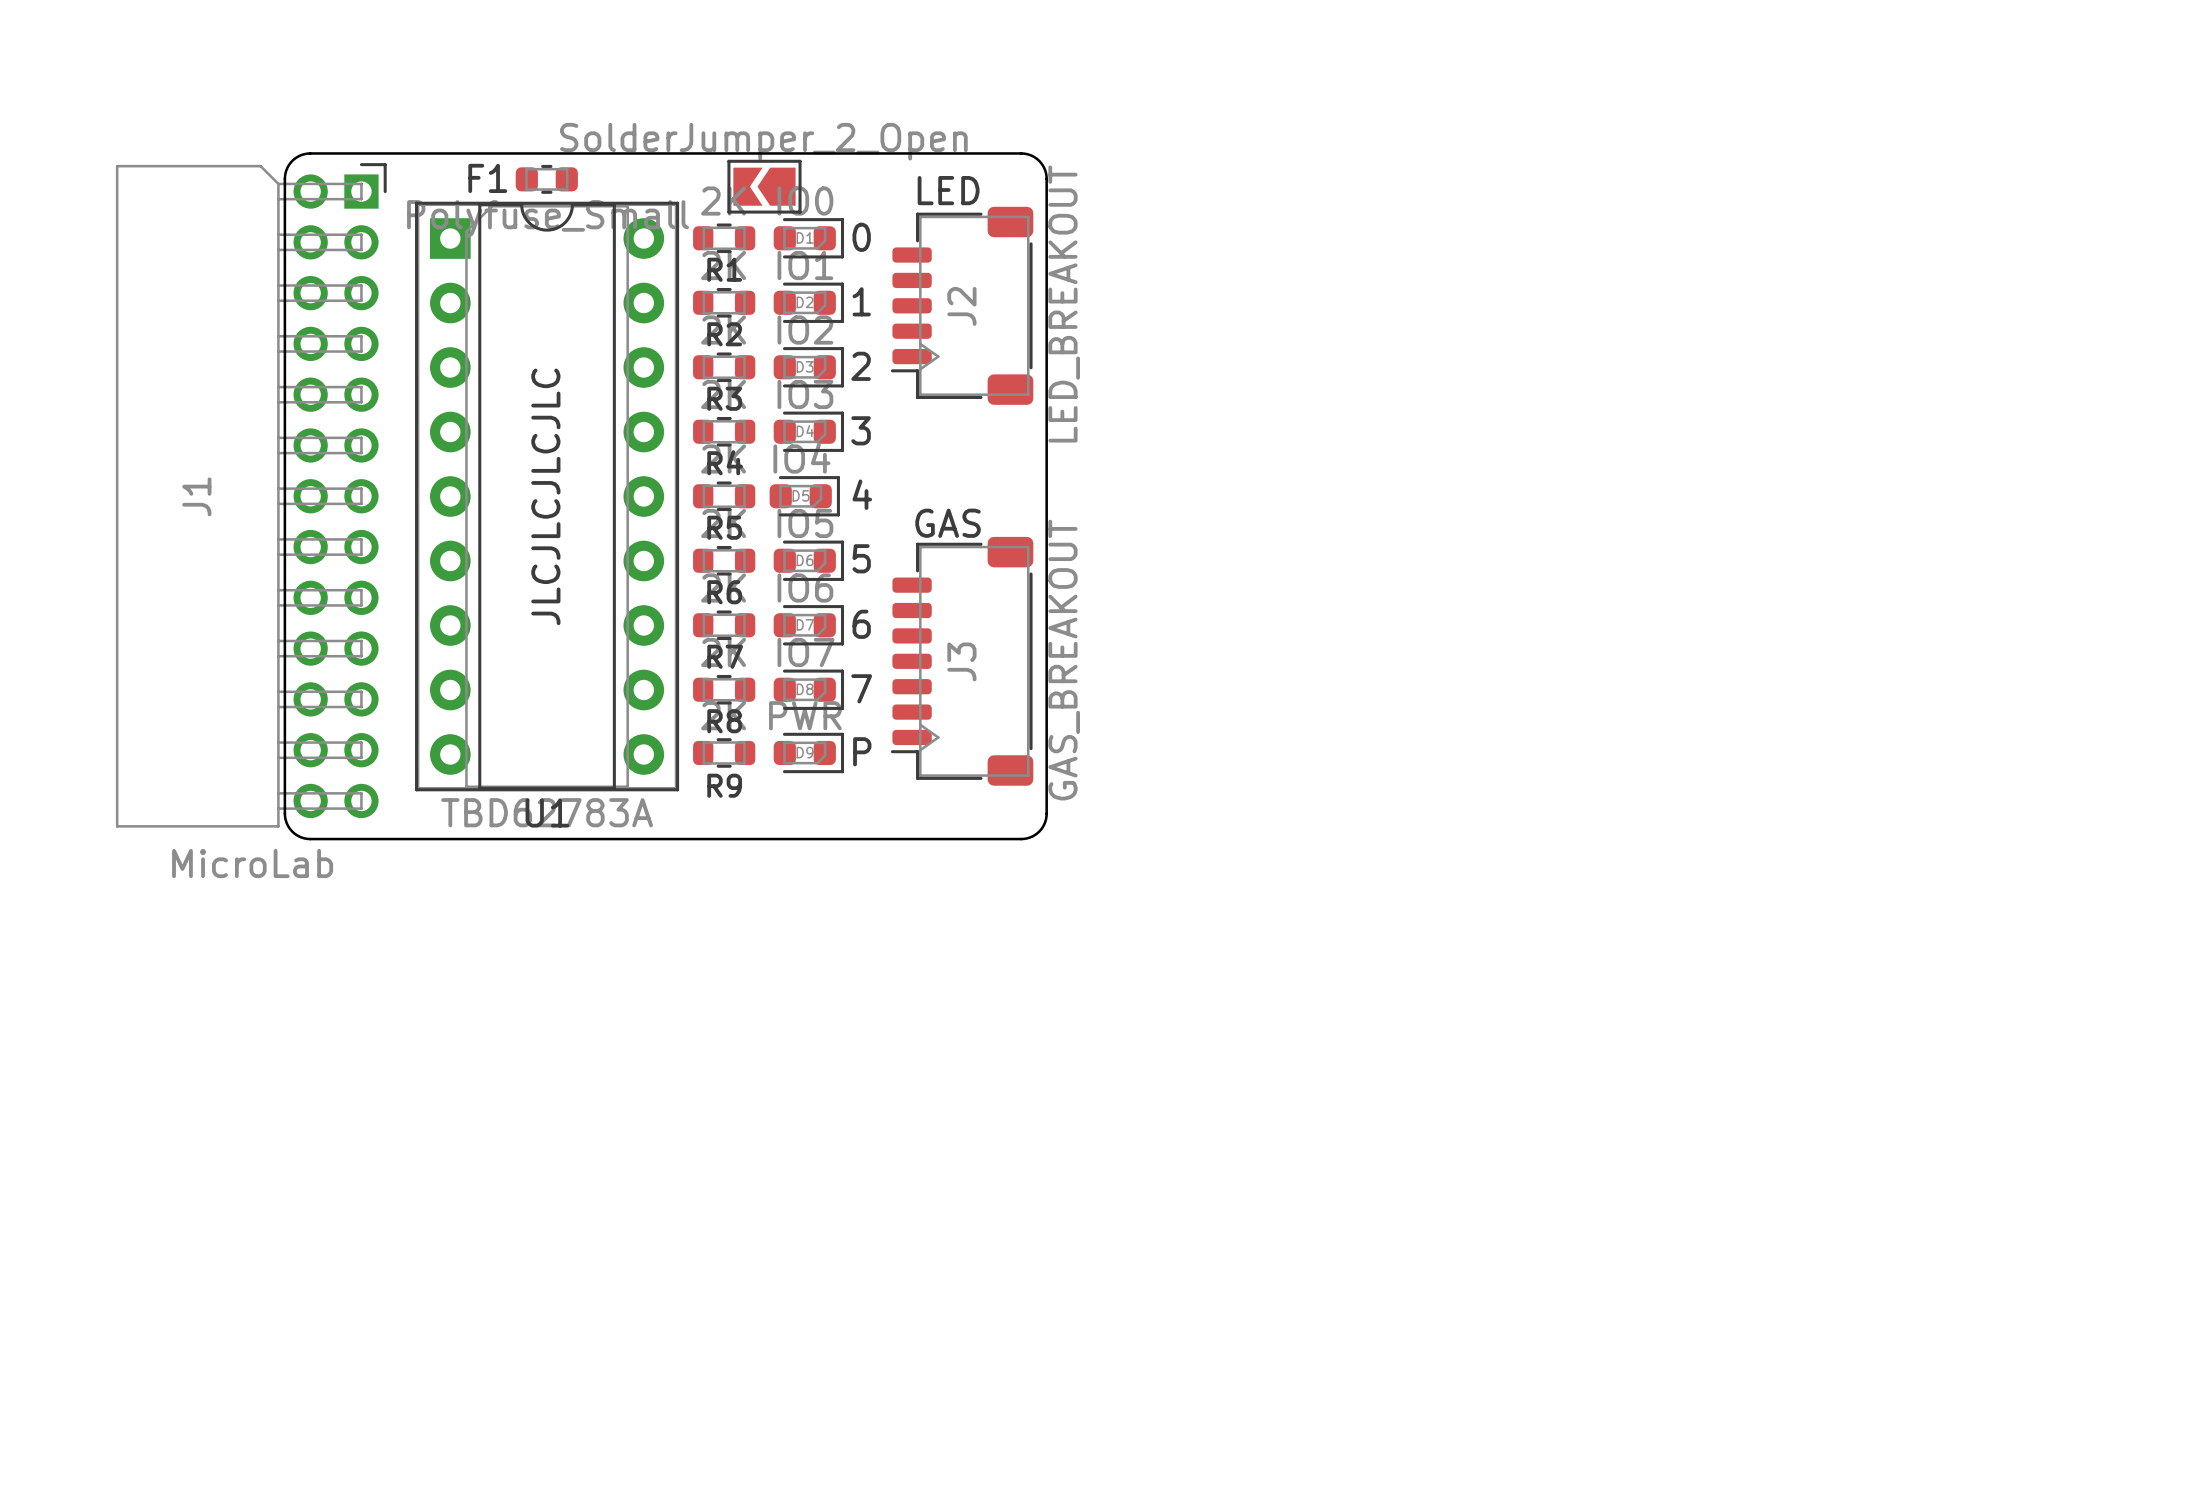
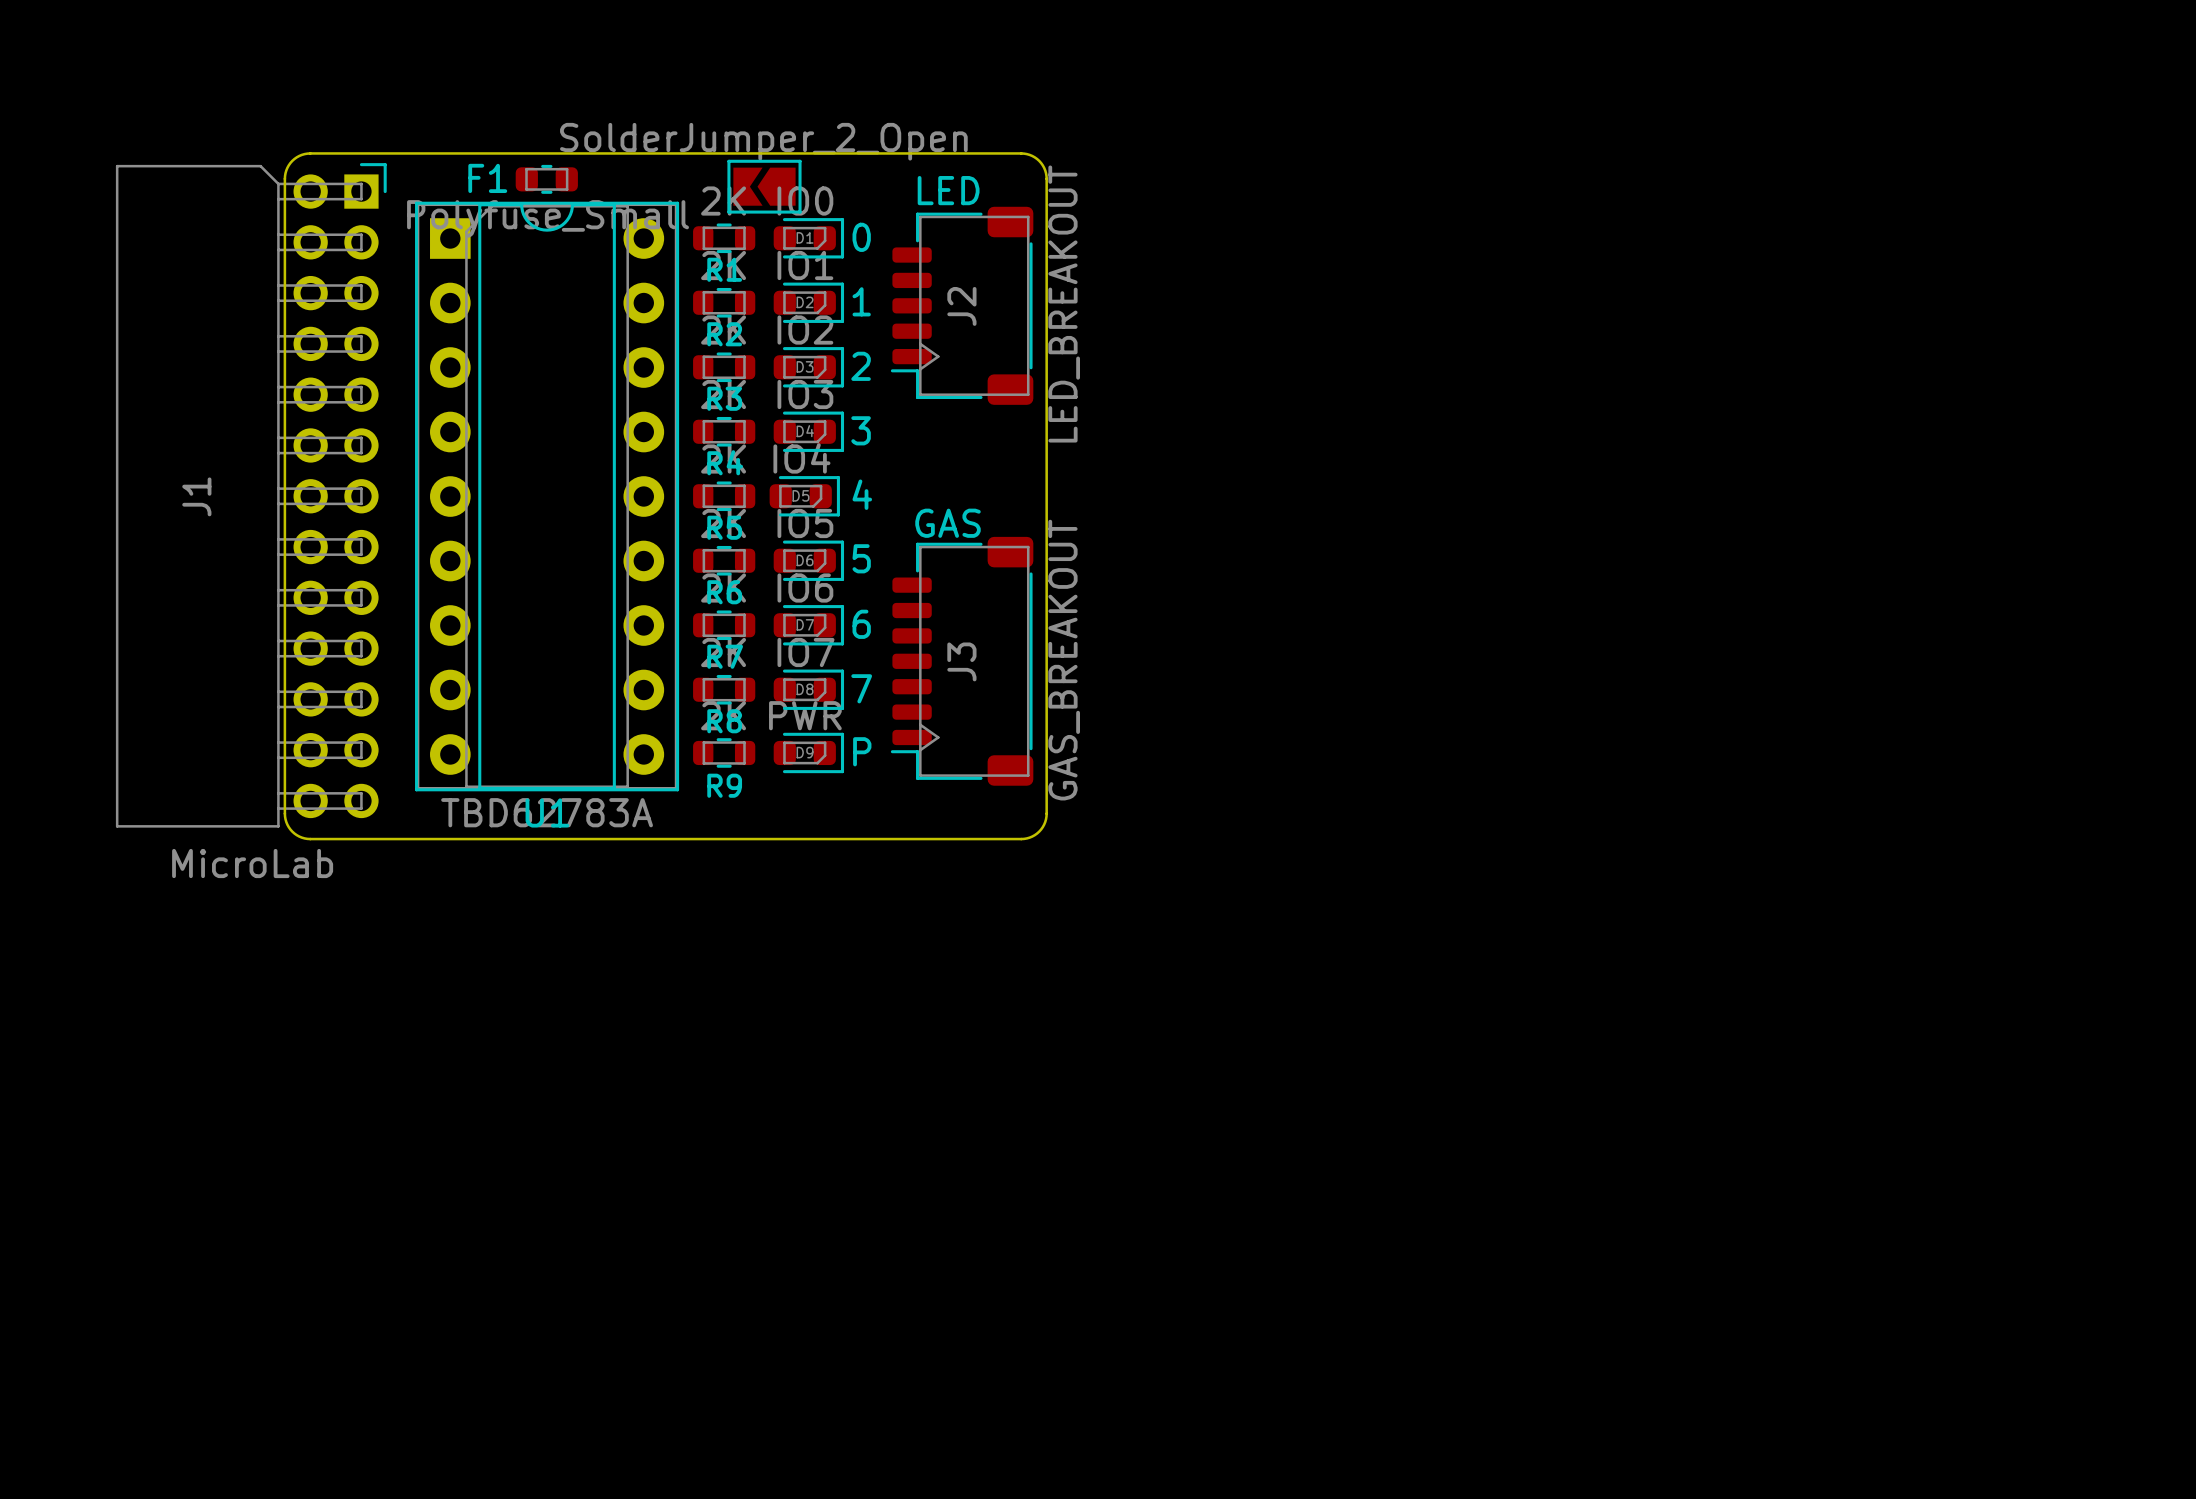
text: JLCJLCJLCJLC (545, 496) -> none

